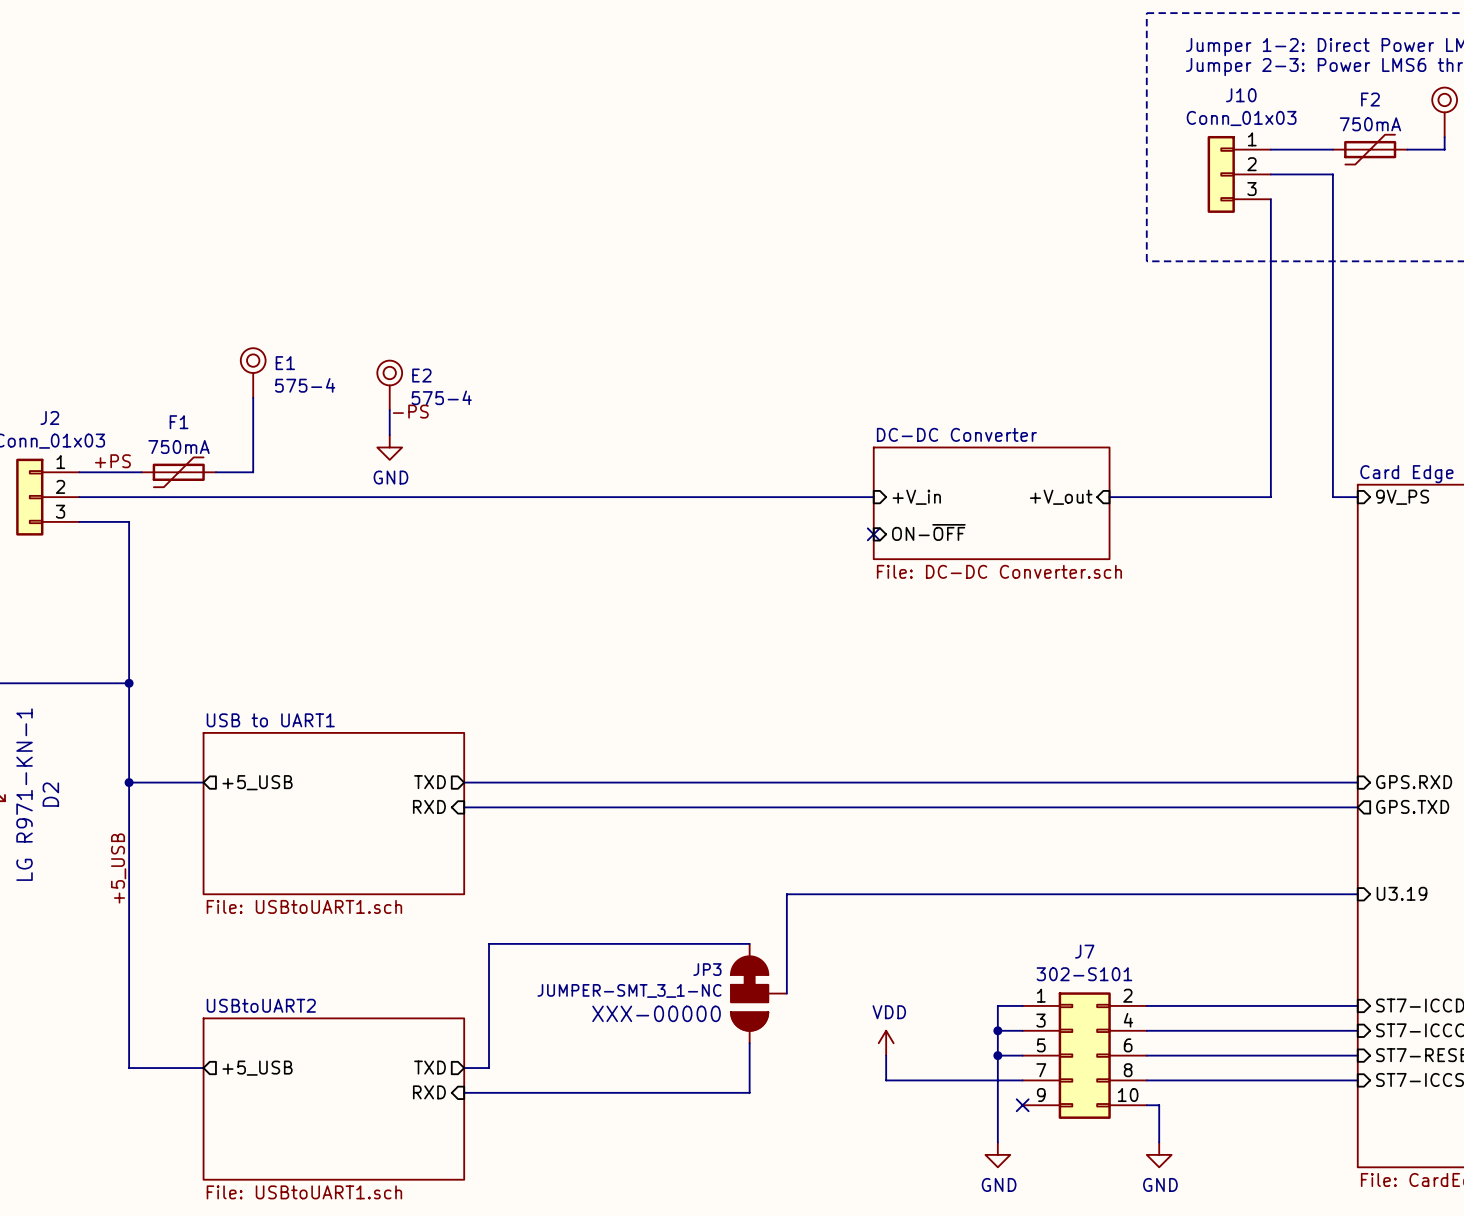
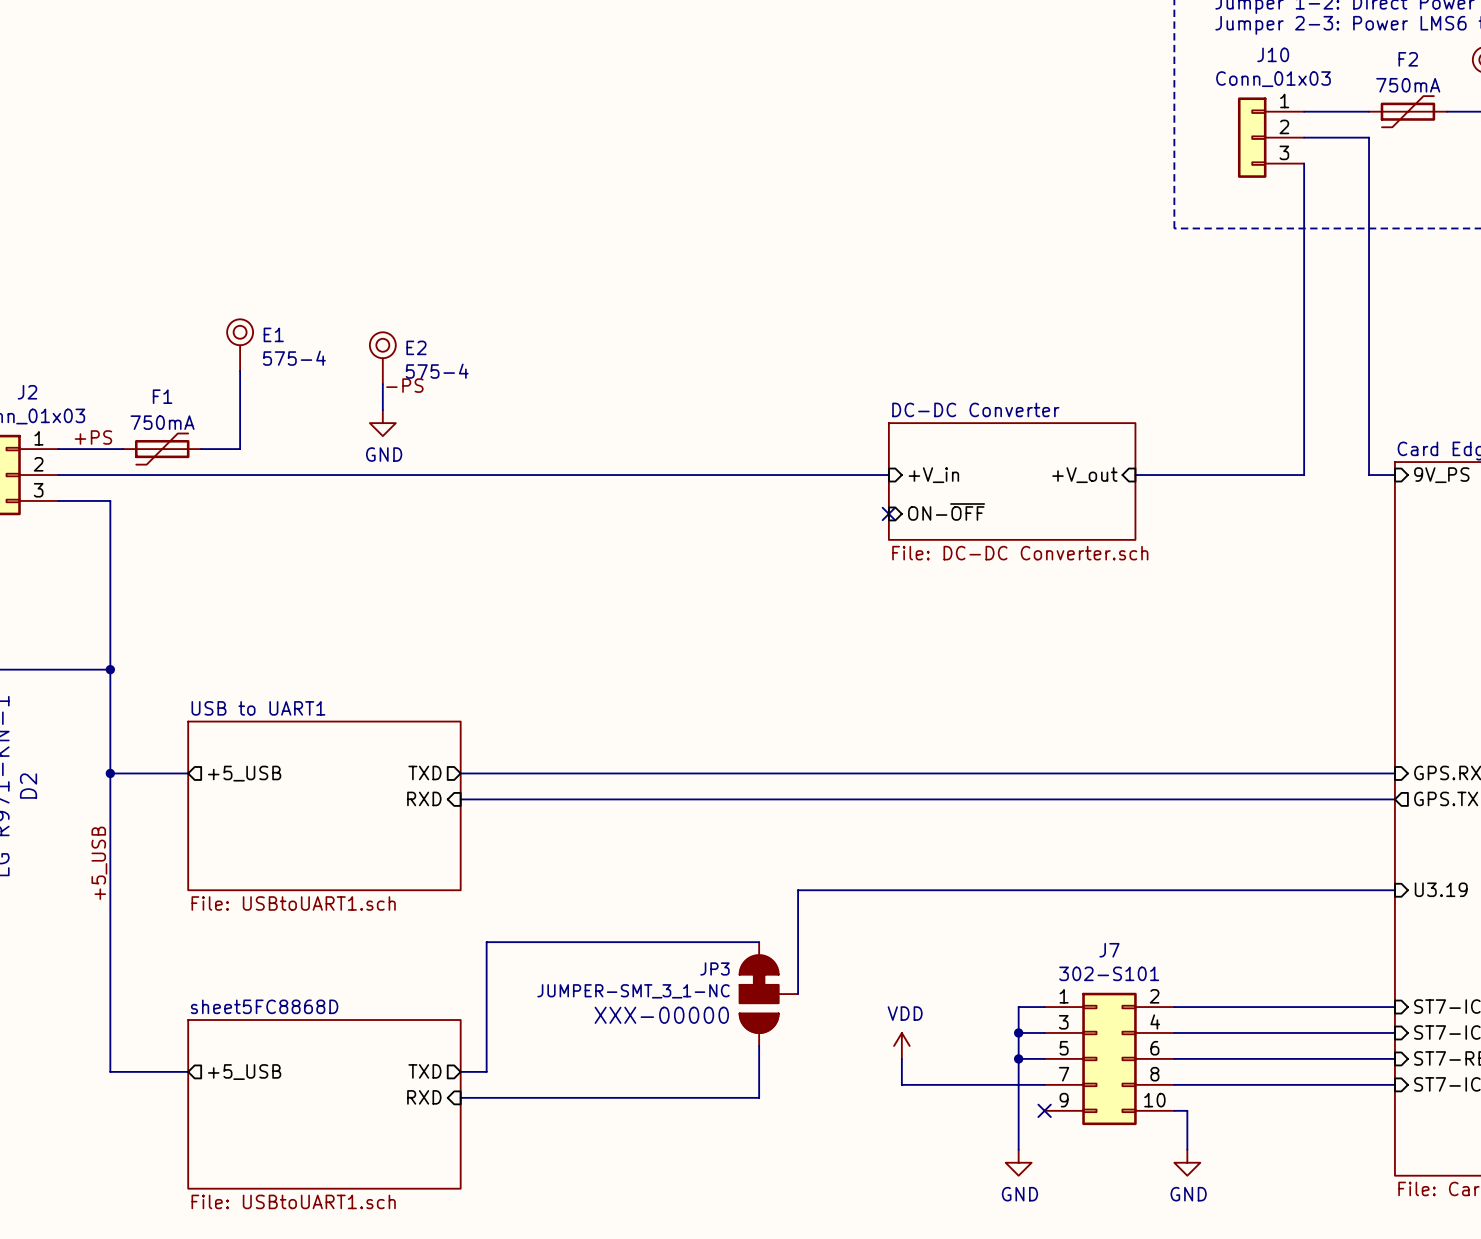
sheet USBtoUART2 name: USBtoUART2 (261, 1005) -> sheet5FC8868D (264, 1006)

